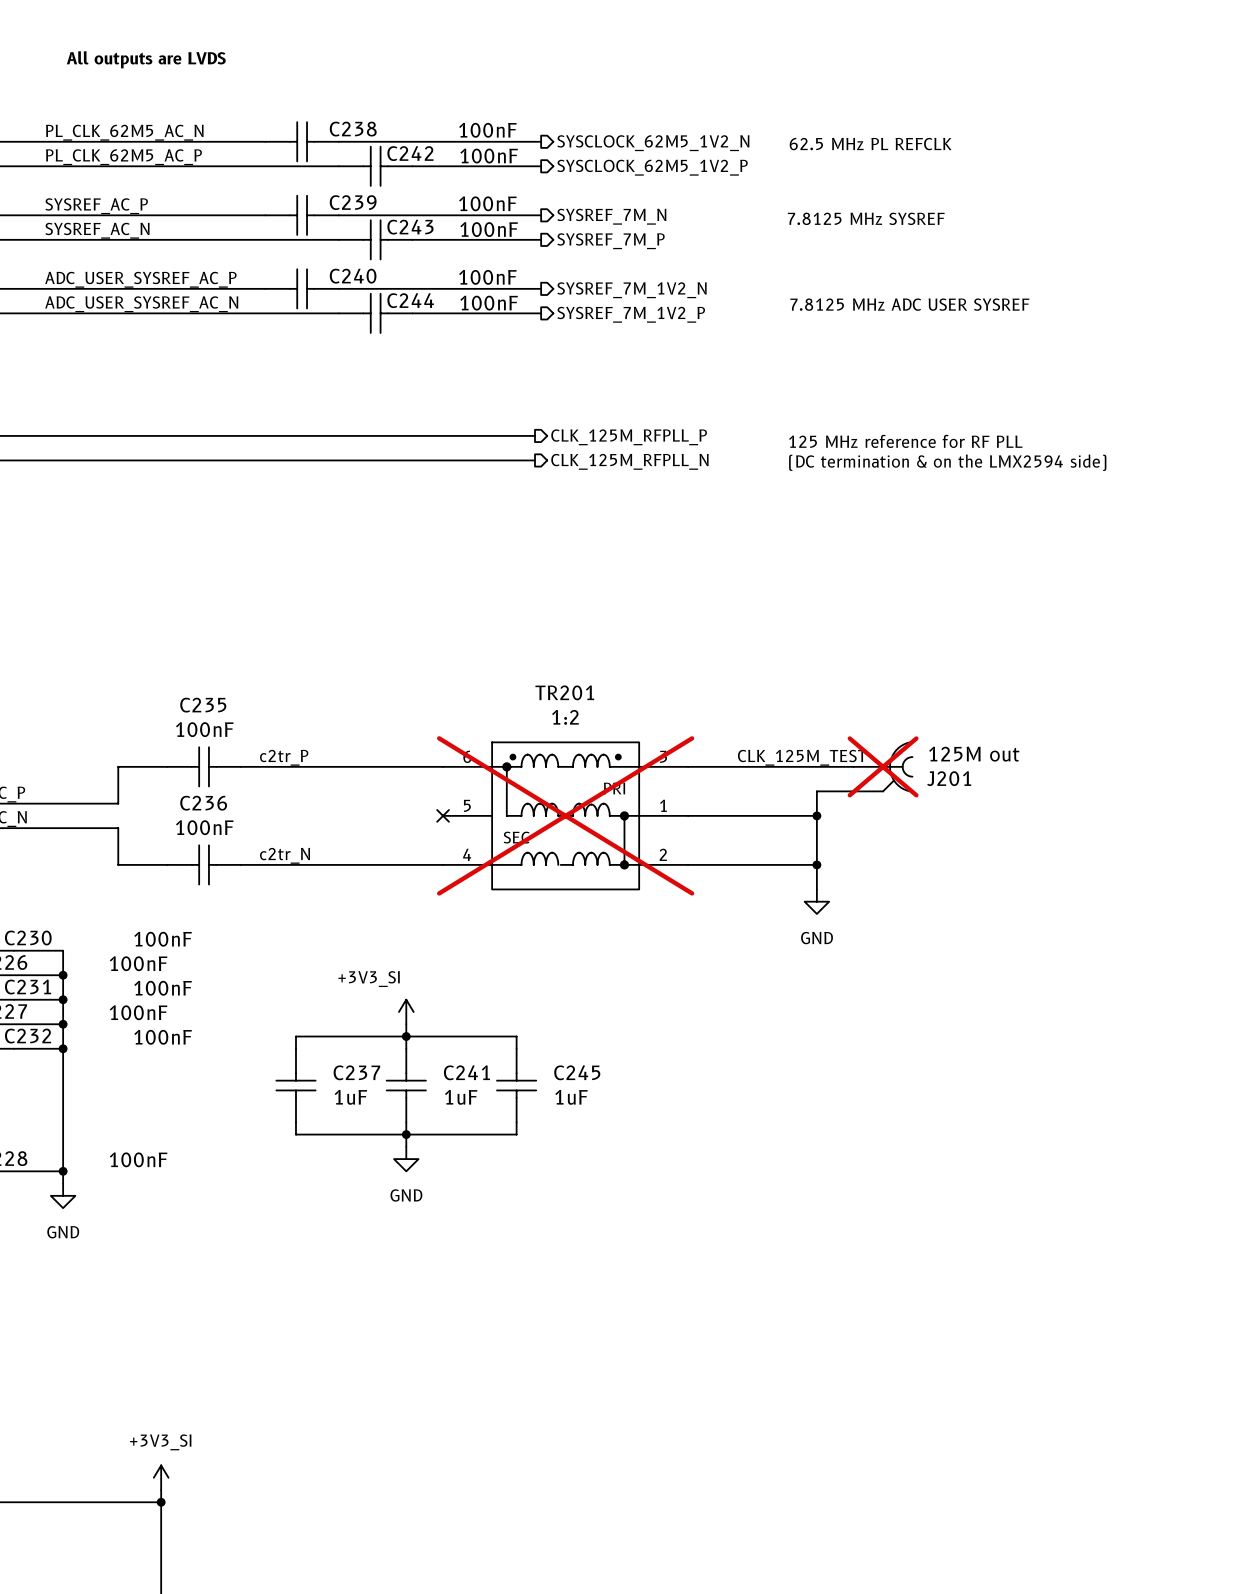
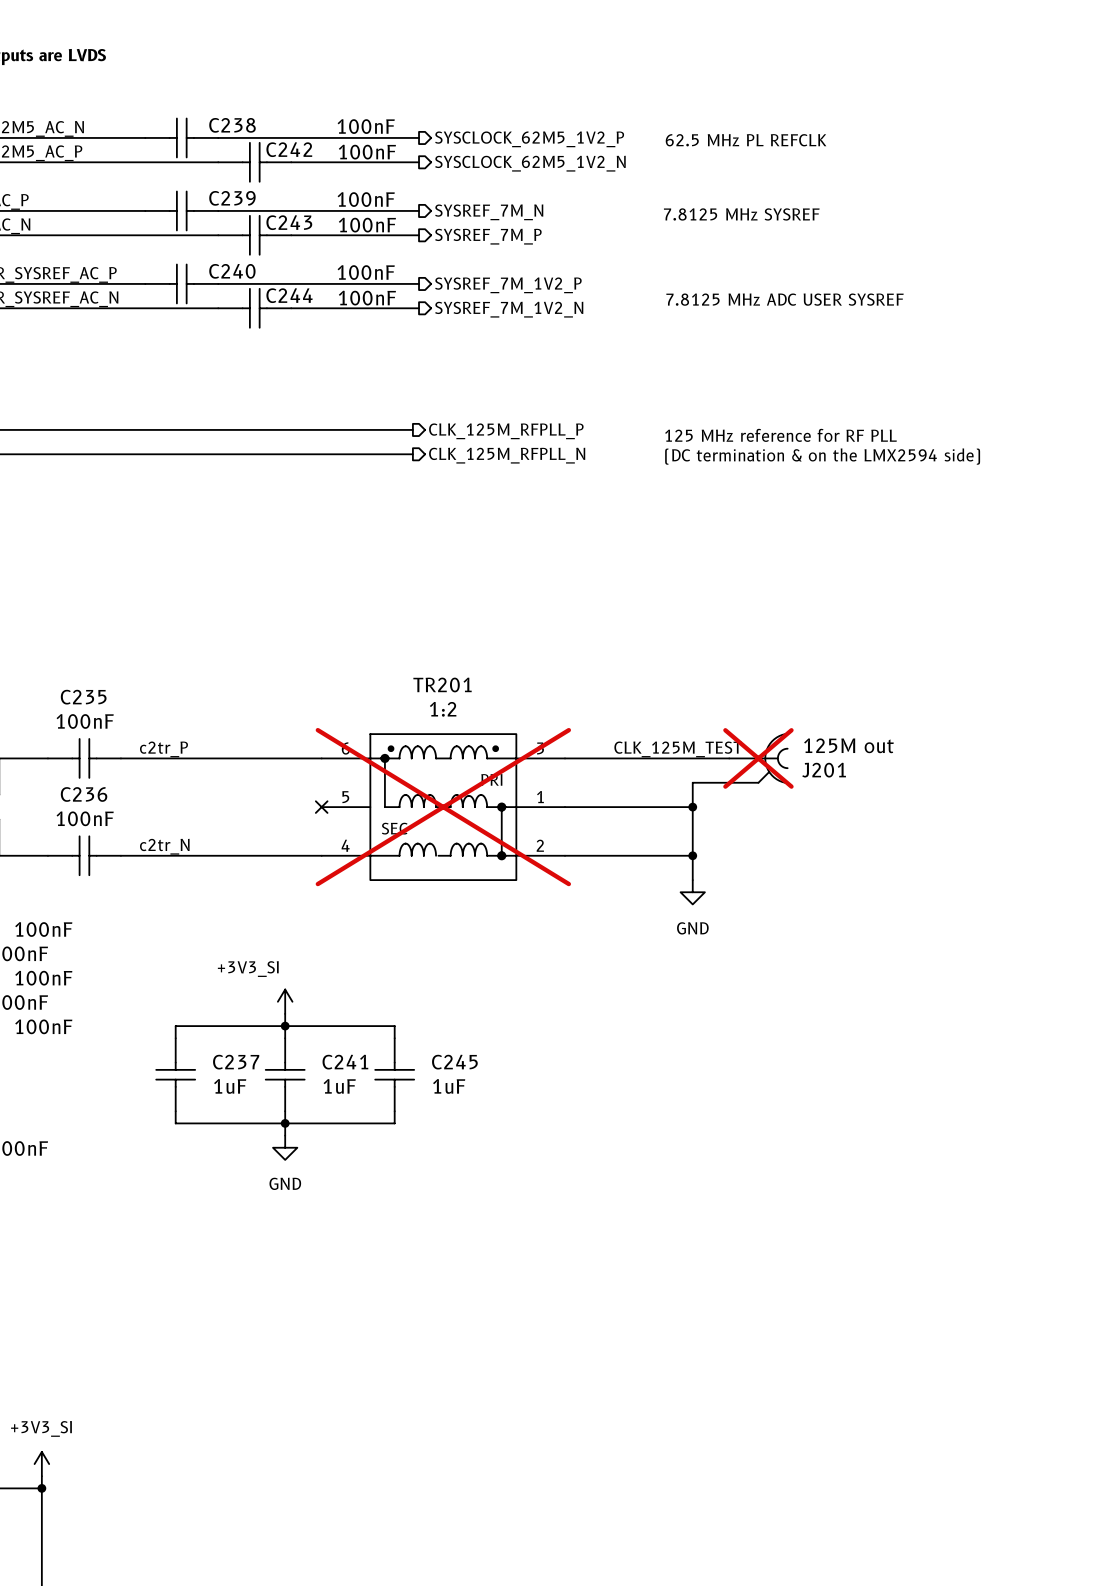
hierarchical label: SYSCLOCK_62M5_1V2_N (653, 143) -> SYSCLOCK_62M5_1V2_P (529, 139)
hierarchical label: SYSCLOCK_62M5_1V2_P (652, 167) -> SYSCLOCK_62M5_1V2_N (530, 163)
hierarchical label: SYSREF_7M_1V2_N (631, 290) -> SYSREF_7M_1V2_P (508, 285)
hierarchical label: SYSREF_7M_1V2_P (631, 314) -> SYSREF_7M_1V2_N (509, 309)

